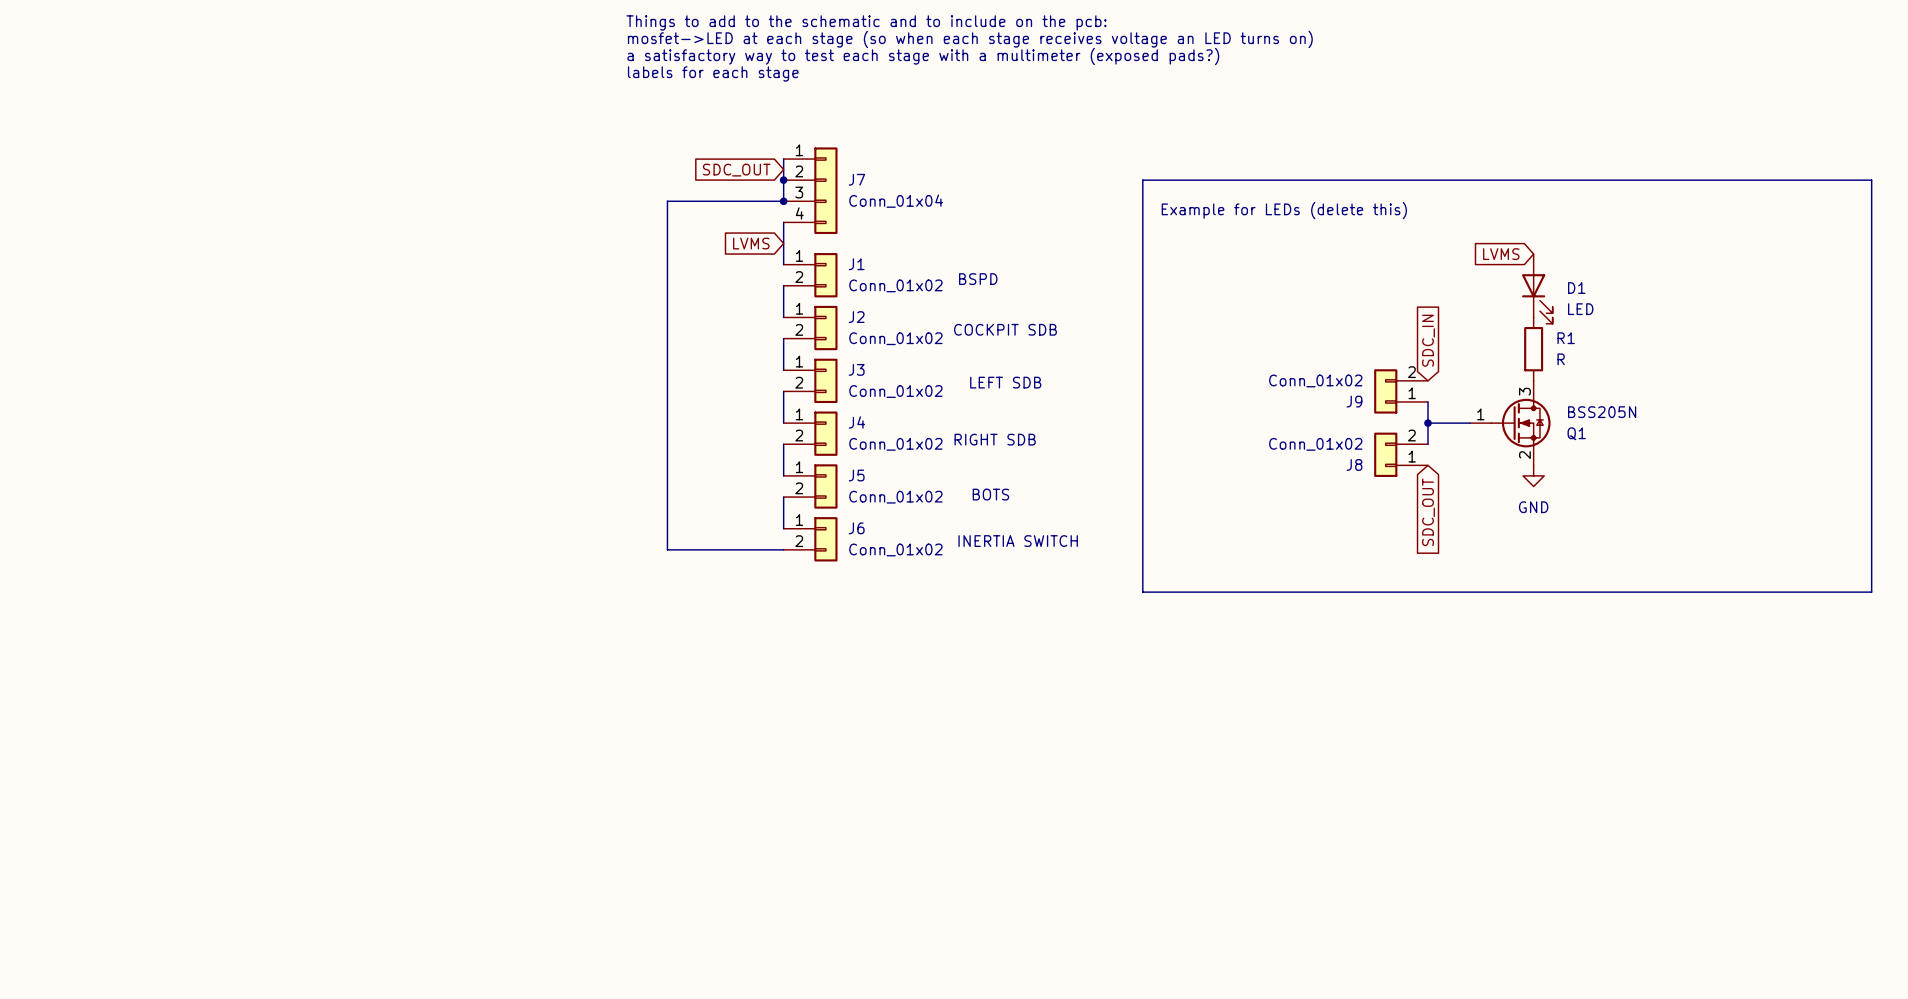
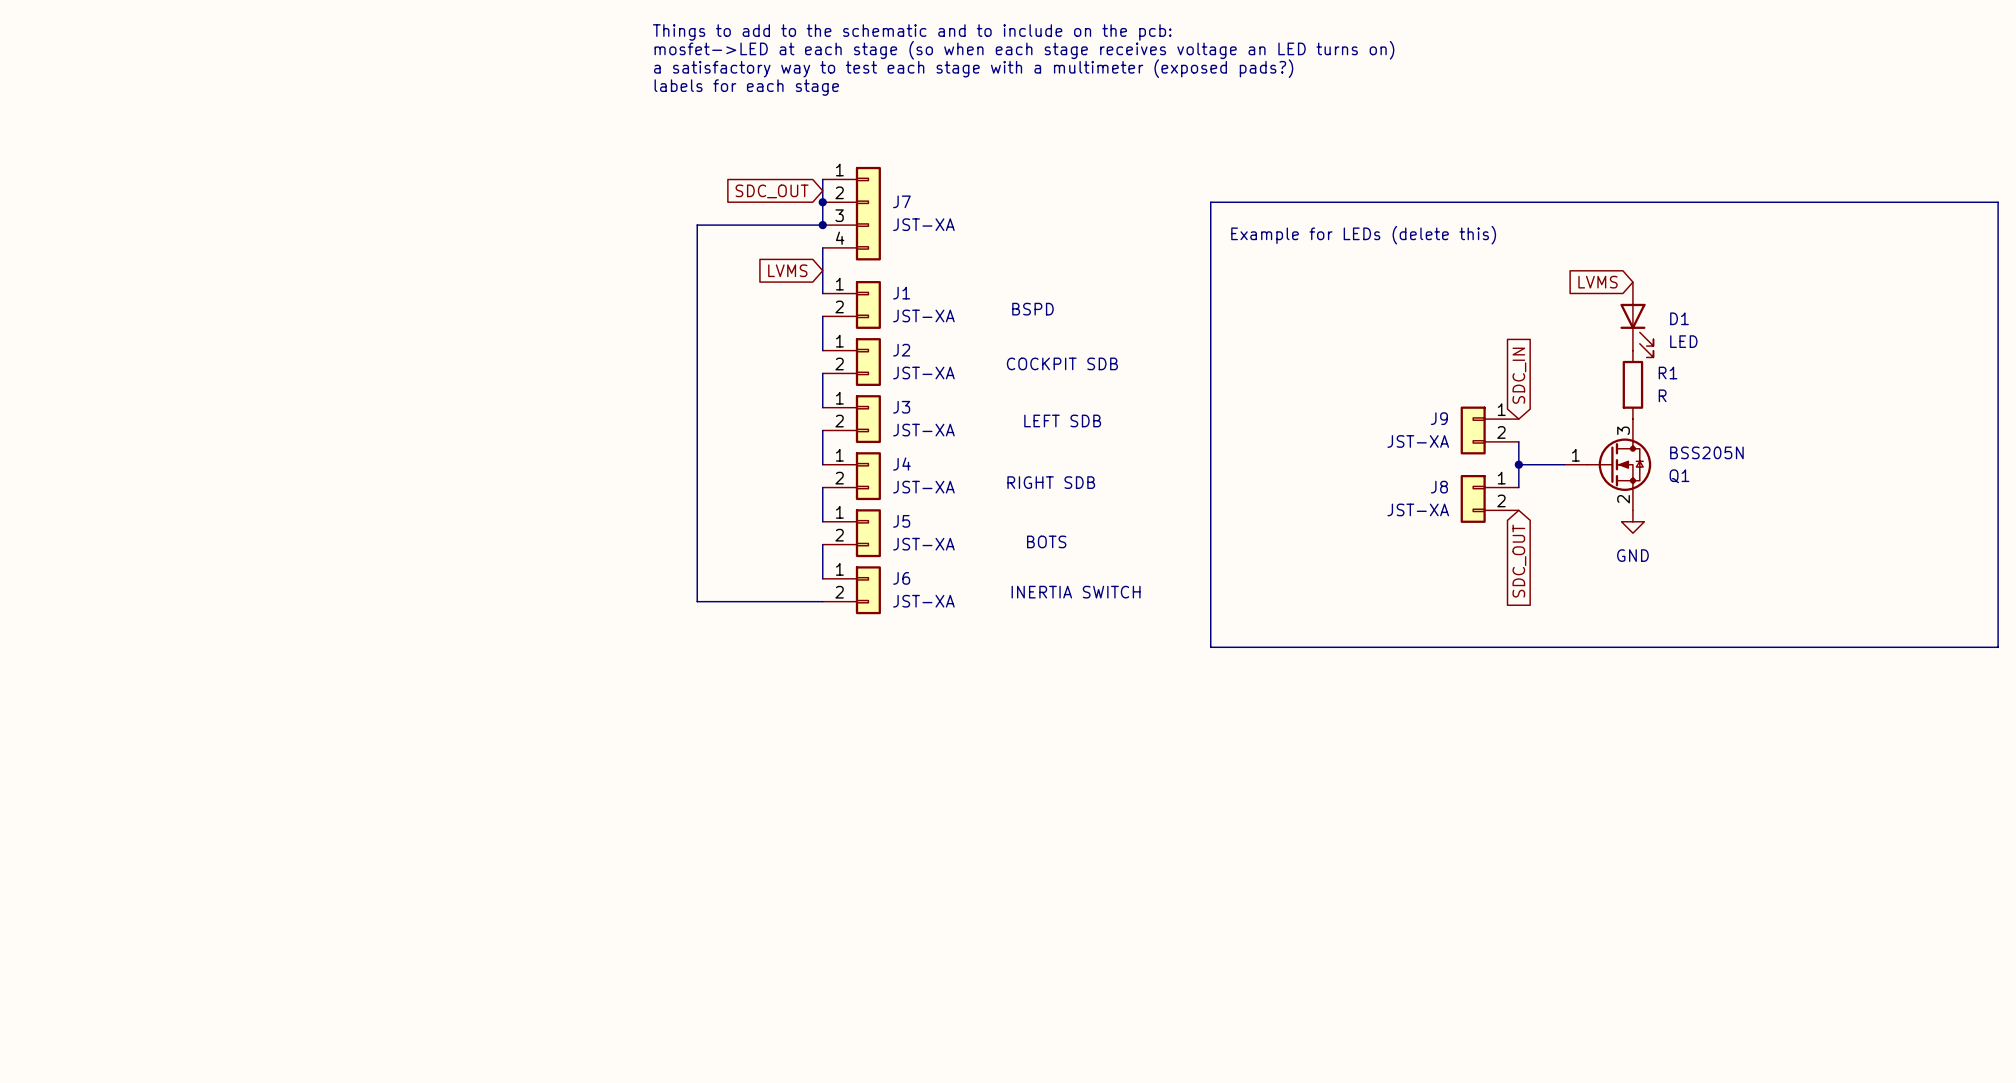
J7 value: Conn_01x04 (896, 201) -> JST-XA (923, 224)
J1 value: Conn_01x02 (895, 285) -> JST-XA (923, 315)
J2 value: Conn_01x02 (895, 338) -> JST-XA (923, 373)
J9 value: Conn_01x02 (1315, 380) -> JST-XA (1418, 441)
J3 value: Conn_01x02 (895, 391) -> JST-XA (923, 430)
J9 flip: as is (1385, 391) -> up-down (1473, 430)
J4 value: Conn_01x02 (895, 444) -> JST-XA (923, 487)
J8 value: Conn_01x02 (1315, 444) -> JST-XA (1418, 509)
J8 flip: as is (1385, 454) -> up-down (1473, 498)
J5 value: Conn_01x02 (895, 497) -> JST-XA (923, 544)
J6 value: Conn_01x02 (895, 549) -> JST-XA (923, 601)

